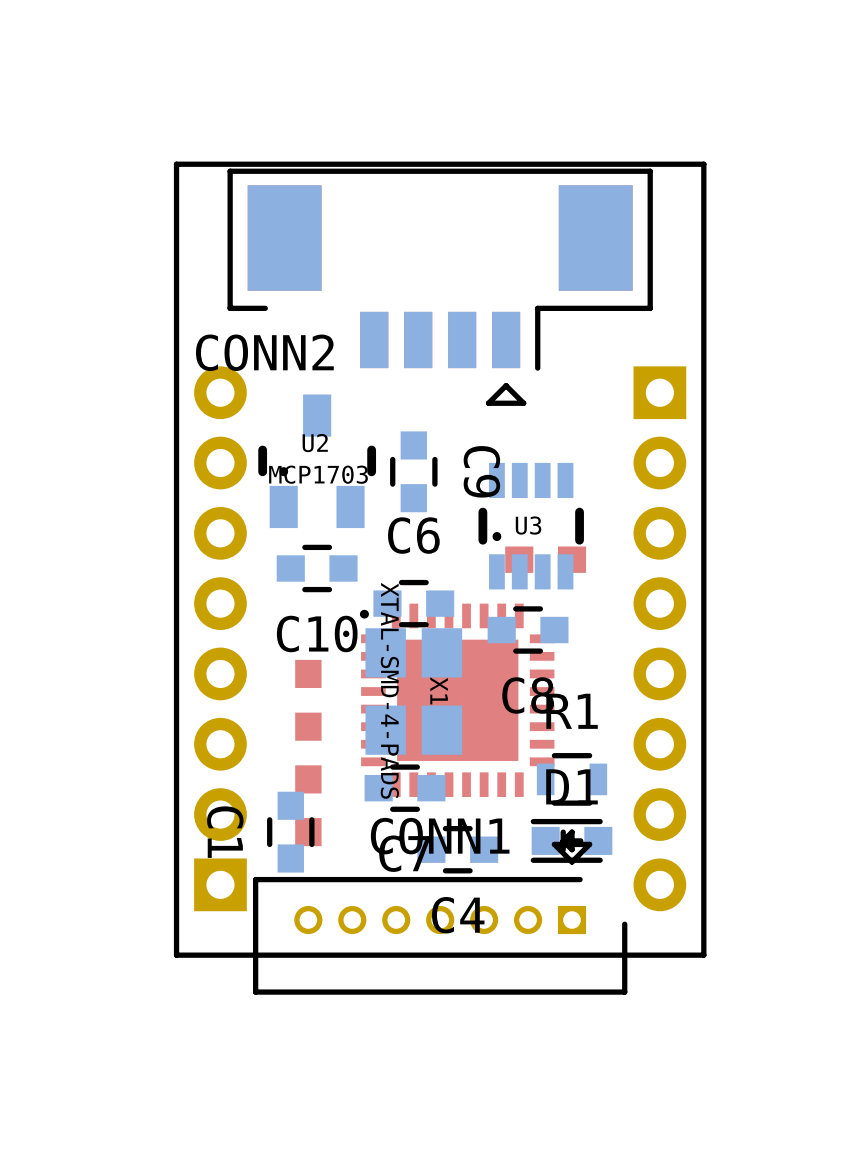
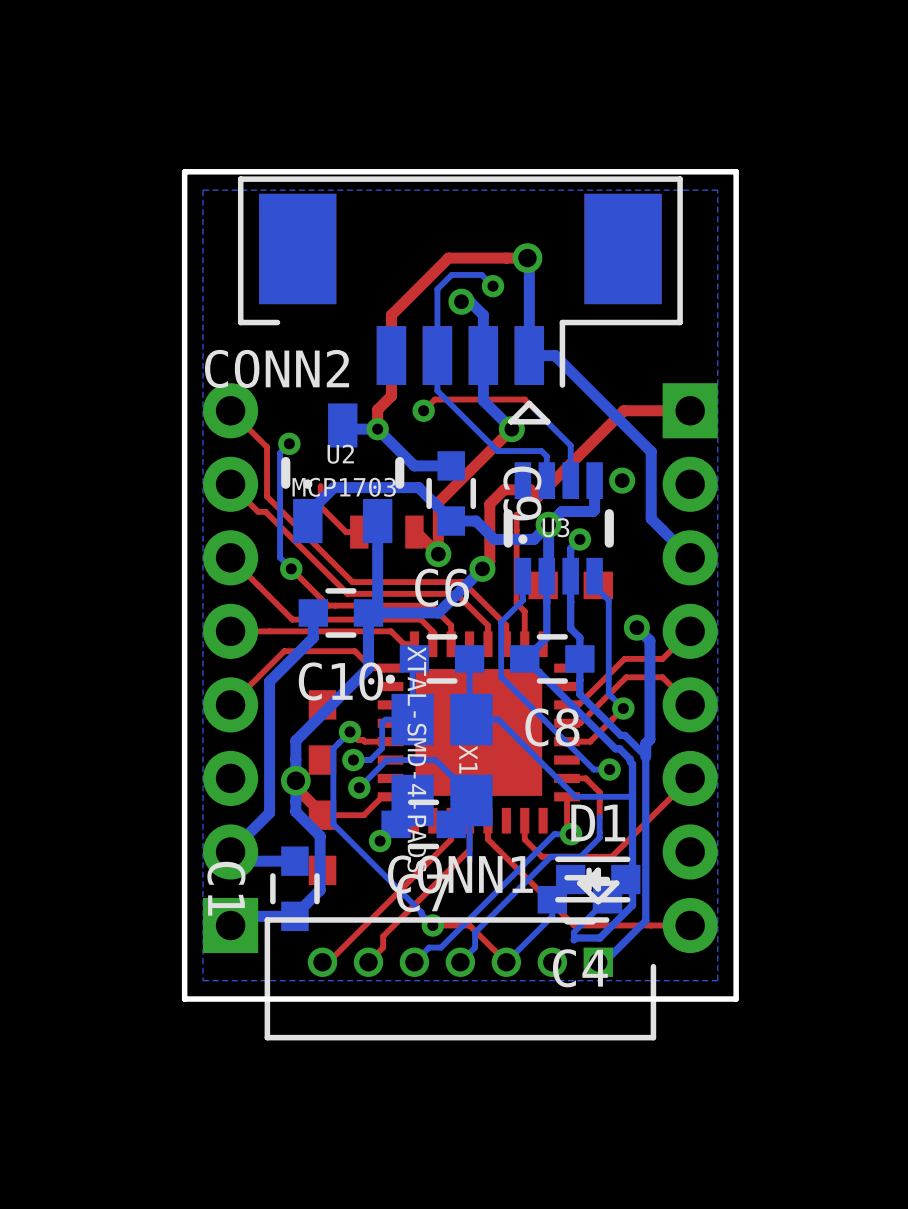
bottom zone outline: none -> (717, 190) (203, 190) (203, 980) (717, 980) (717, 190)
bottom track: none -> (527, 258) (529, 259) (529, 355) (555, 355) (651, 451) (651, 518) (690, 557)
top track: none -> (527, 258) (448, 258) (391, 315) (391, 396) (377, 409) (377, 429)
via: none -> (527, 258)
bottom track: none -> (493, 286) (481, 274) (451, 274) (437, 289) (437, 390) (497, 451) (541, 451) (546, 456) (546, 480)
via: none -> (493, 286)
bottom track: none -> (461, 301) (469, 301) (483, 315) (483, 400) (511, 429)
via: none -> (461, 301)
bottom track: none -> (535, 409) (570, 445) (570, 480)
top track: none -> (535, 409) (524, 399) (434, 399) (423, 410)
top track: none -> (230, 410) (267, 447) (267, 496) (352, 582) (462, 582) (506, 625) (506, 644)
via: none -> (423, 410)
top track: none -> (690, 410) (623, 410) (537, 497) (530, 489) (504, 489) (489, 504) (489, 561) (482, 568)
bottom track: none -> (342, 425) (346, 429) (377, 429) (414, 465) (451, 465)
via: none -> (377, 429)
top track: none -> (511, 429) (438, 502) (438, 554) (414, 532)
via: none -> (511, 429)
bottom track: none -> (289, 443) (280, 453) (280, 557) (291, 568)
via: none -> (289, 443)
bottom track: none -> (594, 480) (593, 511) (561, 511) (533, 539) (494, 539) (476, 521) (451, 521) (418, 487) (333, 487) (307, 513) (307, 521)
via: none -> (622, 480)
U2 position: (317, 461) -> (342, 473)
top track: none -> (230, 484) (258, 511) (265, 511) (347, 593) (456, 593) (487, 625) (487, 644)
top track: none -> (320, 486) (320, 506) (346, 532) (359, 532)
C9 position: (413, 471) -> (451, 493)
top track: none -> (516, 514) (516, 603) (524, 611) (524, 644)
bottom track: none -> (377, 521) (377, 603) (368, 612)
bottom track: none -> (548, 524) (546, 637) (525, 658)
via: none -> (548, 524)
bottom track: none -> (579, 539) (570, 548) (570, 628) (579, 637) (579, 694) (620, 735) (624, 735) (645, 756)
via: none -> (579, 539)
U3 position: (531, 526) -> (558, 528)
via: none -> (438, 554)
top track: none -> (230, 557) (292, 619) (420, 619) (432, 631) (432, 644)
top track: none -> (291, 568) (328, 605) (431, 605) (451, 625) (451, 644)
via: none -> (291, 568)
bottom track: none -> (482, 568) (438, 612) (368, 612)
via: none -> (482, 568)
bottom track: none -> (522, 576) (522, 600) (501, 622) (501, 677) (593, 769) (609, 769)
bottom track: none -> (594, 576) (594, 586) (608, 600) (608, 693) (623, 708)
C10 position: (317, 568) -> (340, 612)
bottom track: none -> (313, 612) (313, 637) (269, 681) (269, 812) (230, 851) (239, 861) (294, 861)
bottom track: none -> (368, 612) (368, 668) (295, 740) (295, 811) (320, 836) (320, 890) (294, 916) (239, 916) (230, 925)
bottom track: none -> (636, 627) (649, 640) (649, 739) (645, 743) (645, 756)
via: none -> (636, 627)
top track: none -> (230, 631) (391, 631) (403, 644) (414, 644)
C6 position: (413, 603) -> (442, 658)
top track: none -> (690, 631) (662, 658) (624, 658) (578, 704) (567, 704)
bottom track: none -> (414, 658) (412, 660) (412, 719) (385, 719) (382, 723) (382, 748) (370, 760) (353, 760)
bottom track: none -> (469, 658) (469, 717) (471, 719) (498, 719) (575, 796) (632, 796)
bottom track: none -> (525, 658) (615, 748) (619, 748) (632, 764) (632, 905) (599, 938) (575, 938) (574, 939) (574, 932) (607, 899)
top track: none -> (390, 668) (371, 668) (354, 651) (284, 651) (230, 704)
top track: none -> (690, 704) (662, 677) (626, 677) (580, 723) (567, 723)
top track: none -> (623, 708) (590, 741) (567, 741)
via: none -> (623, 708)
X1 position: (411, 682) -> (439, 750)
bottom track: none -> (350, 731) (333, 748) (333, 824) (432, 925)
top track: none -> (350, 731) (358, 740) (364, 741) (390, 741)
via: none -> (350, 731)
bottom track: none -> (645, 756) (645, 920) (604, 962) (598, 962)
via: none -> (353, 760)
via: none -> (609, 769)
top track: none -> (567, 778) (585, 778) (599, 792) (599, 816)
top track: none -> (690, 778) (611, 856) (542, 856) (524, 839) (524, 820)
top track: none -> (295, 780) (295, 787) (322, 815) (363, 815) (382, 796) (390, 796)
via: none -> (295, 780)
bottom track: none -> (359, 787) (387, 760) (435, 760) (471, 795) (469, 802) (469, 861)
via: none -> (359, 787)
top track: none -> (567, 796) (567, 830) (571, 834)
R1 side: bottom (572, 779) -> top (386, 532)
bottom track: none -> (599, 816) (599, 837) (580, 856) (550, 856) (475, 932) (475, 947) (460, 962)
top track: none -> (451, 820) (451, 839) (328, 962) (322, 962)
top track: none -> (469, 820) (469, 849) (383, 936) (383, 947) (368, 962)
top track: none -> (487, 820) (487, 839) (574, 925) (690, 925)
bottom track: none -> (571, 834) (554, 834) (440, 947) (429, 947) (414, 962)
via: none -> (571, 834)
via: none -> (380, 841)
C1 position: (290, 832) -> (294, 888)
C4 position: (457, 849) -> (579, 899)
bottom track: none -> (552, 899) (552, 916) (506, 962)
top track: none -> (432, 925) (469, 925) (506, 962)
via: none -> (432, 925)

